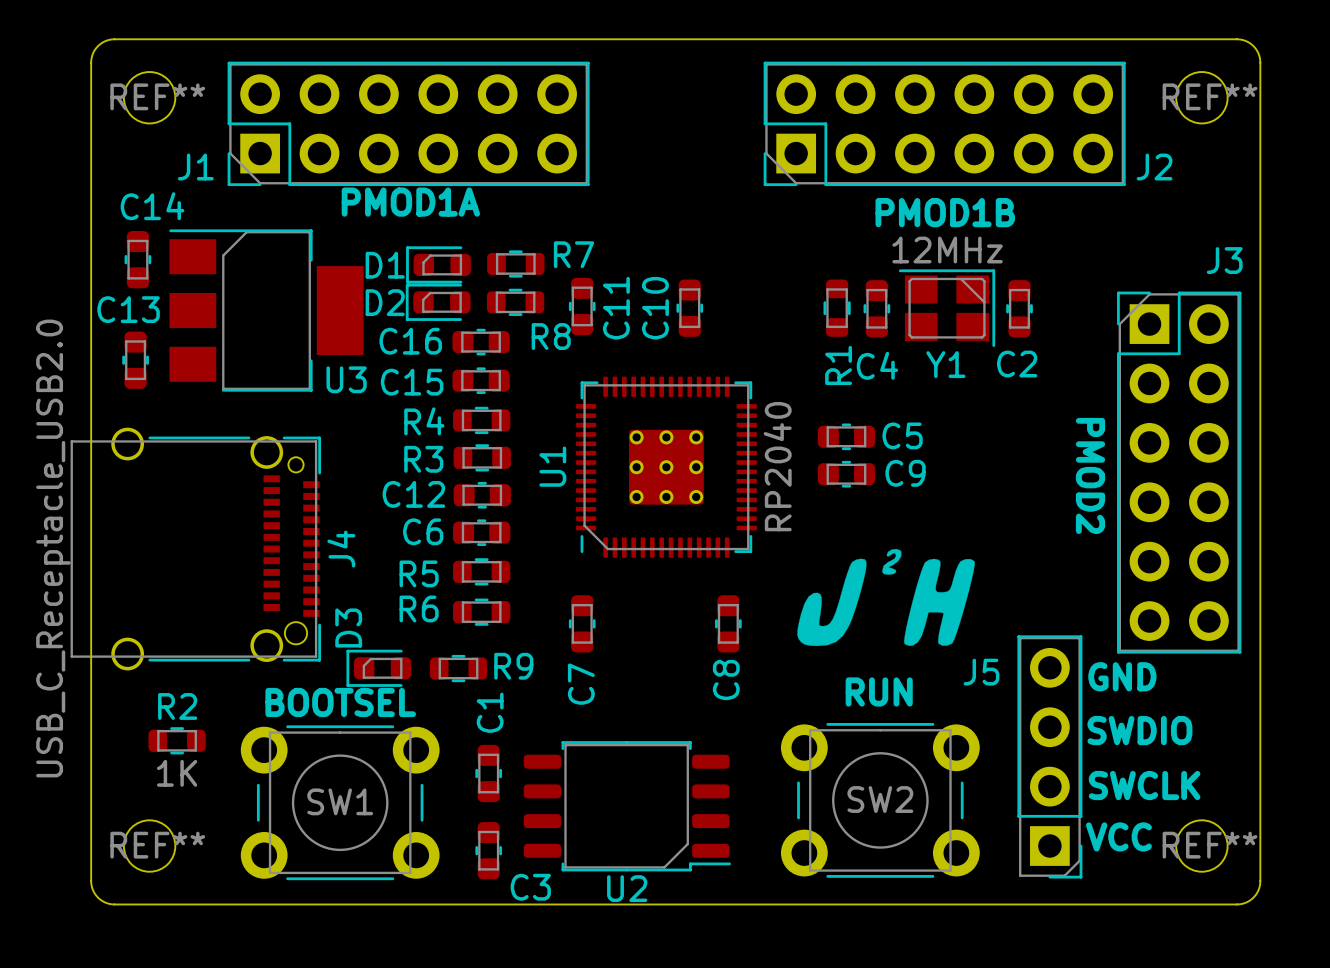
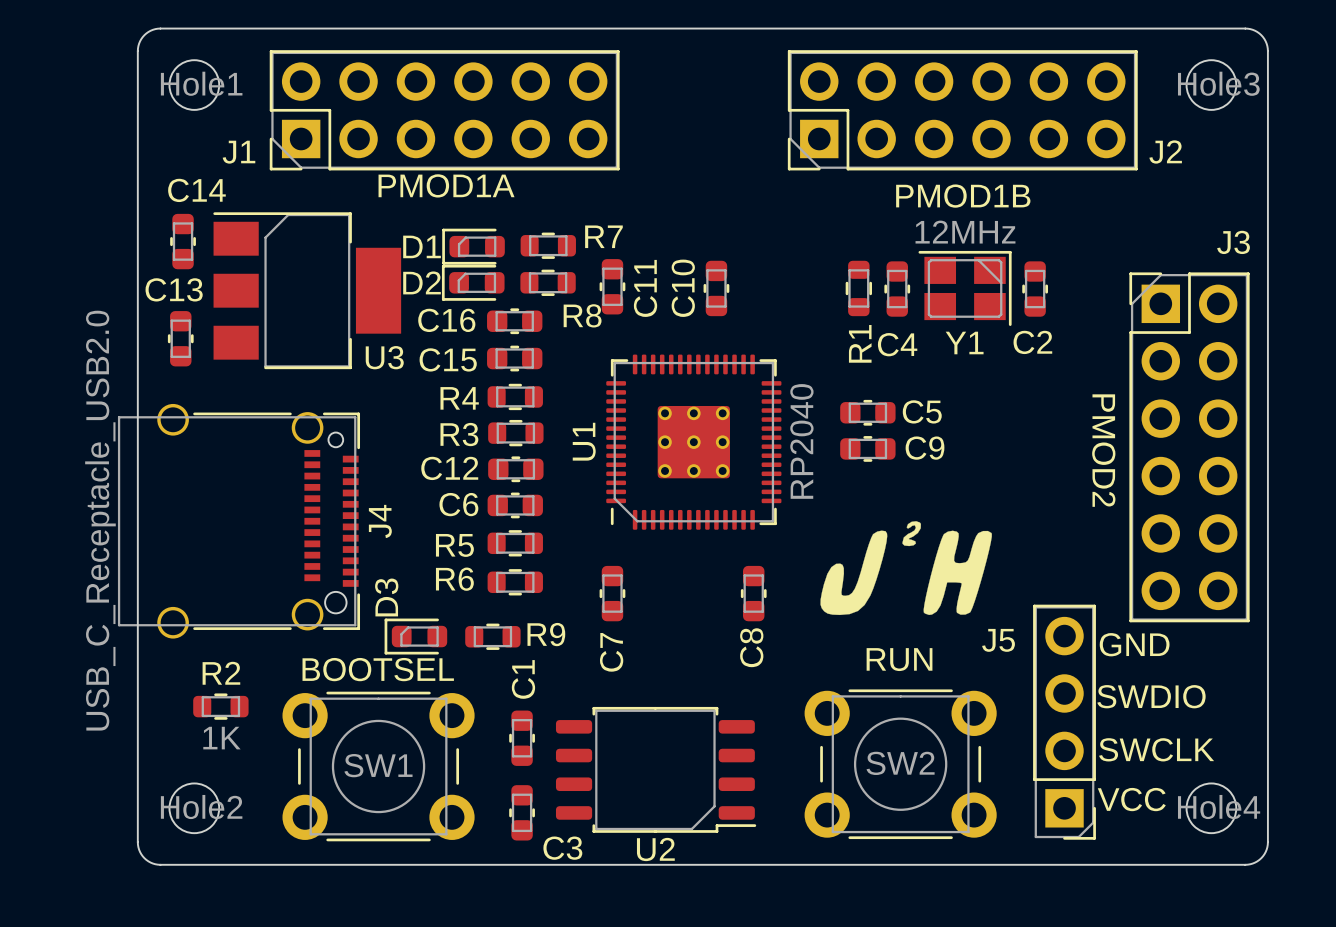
REF** name: REF** (157, 96) -> Hole1 (201, 83)
REF** name: REF** (1210, 96) -> Hole3 (1218, 83)
REF** name: REF** (157, 845) -> Hole2 (201, 807)
REF** name: REF** (1210, 845) -> Hole4 (1219, 807)

